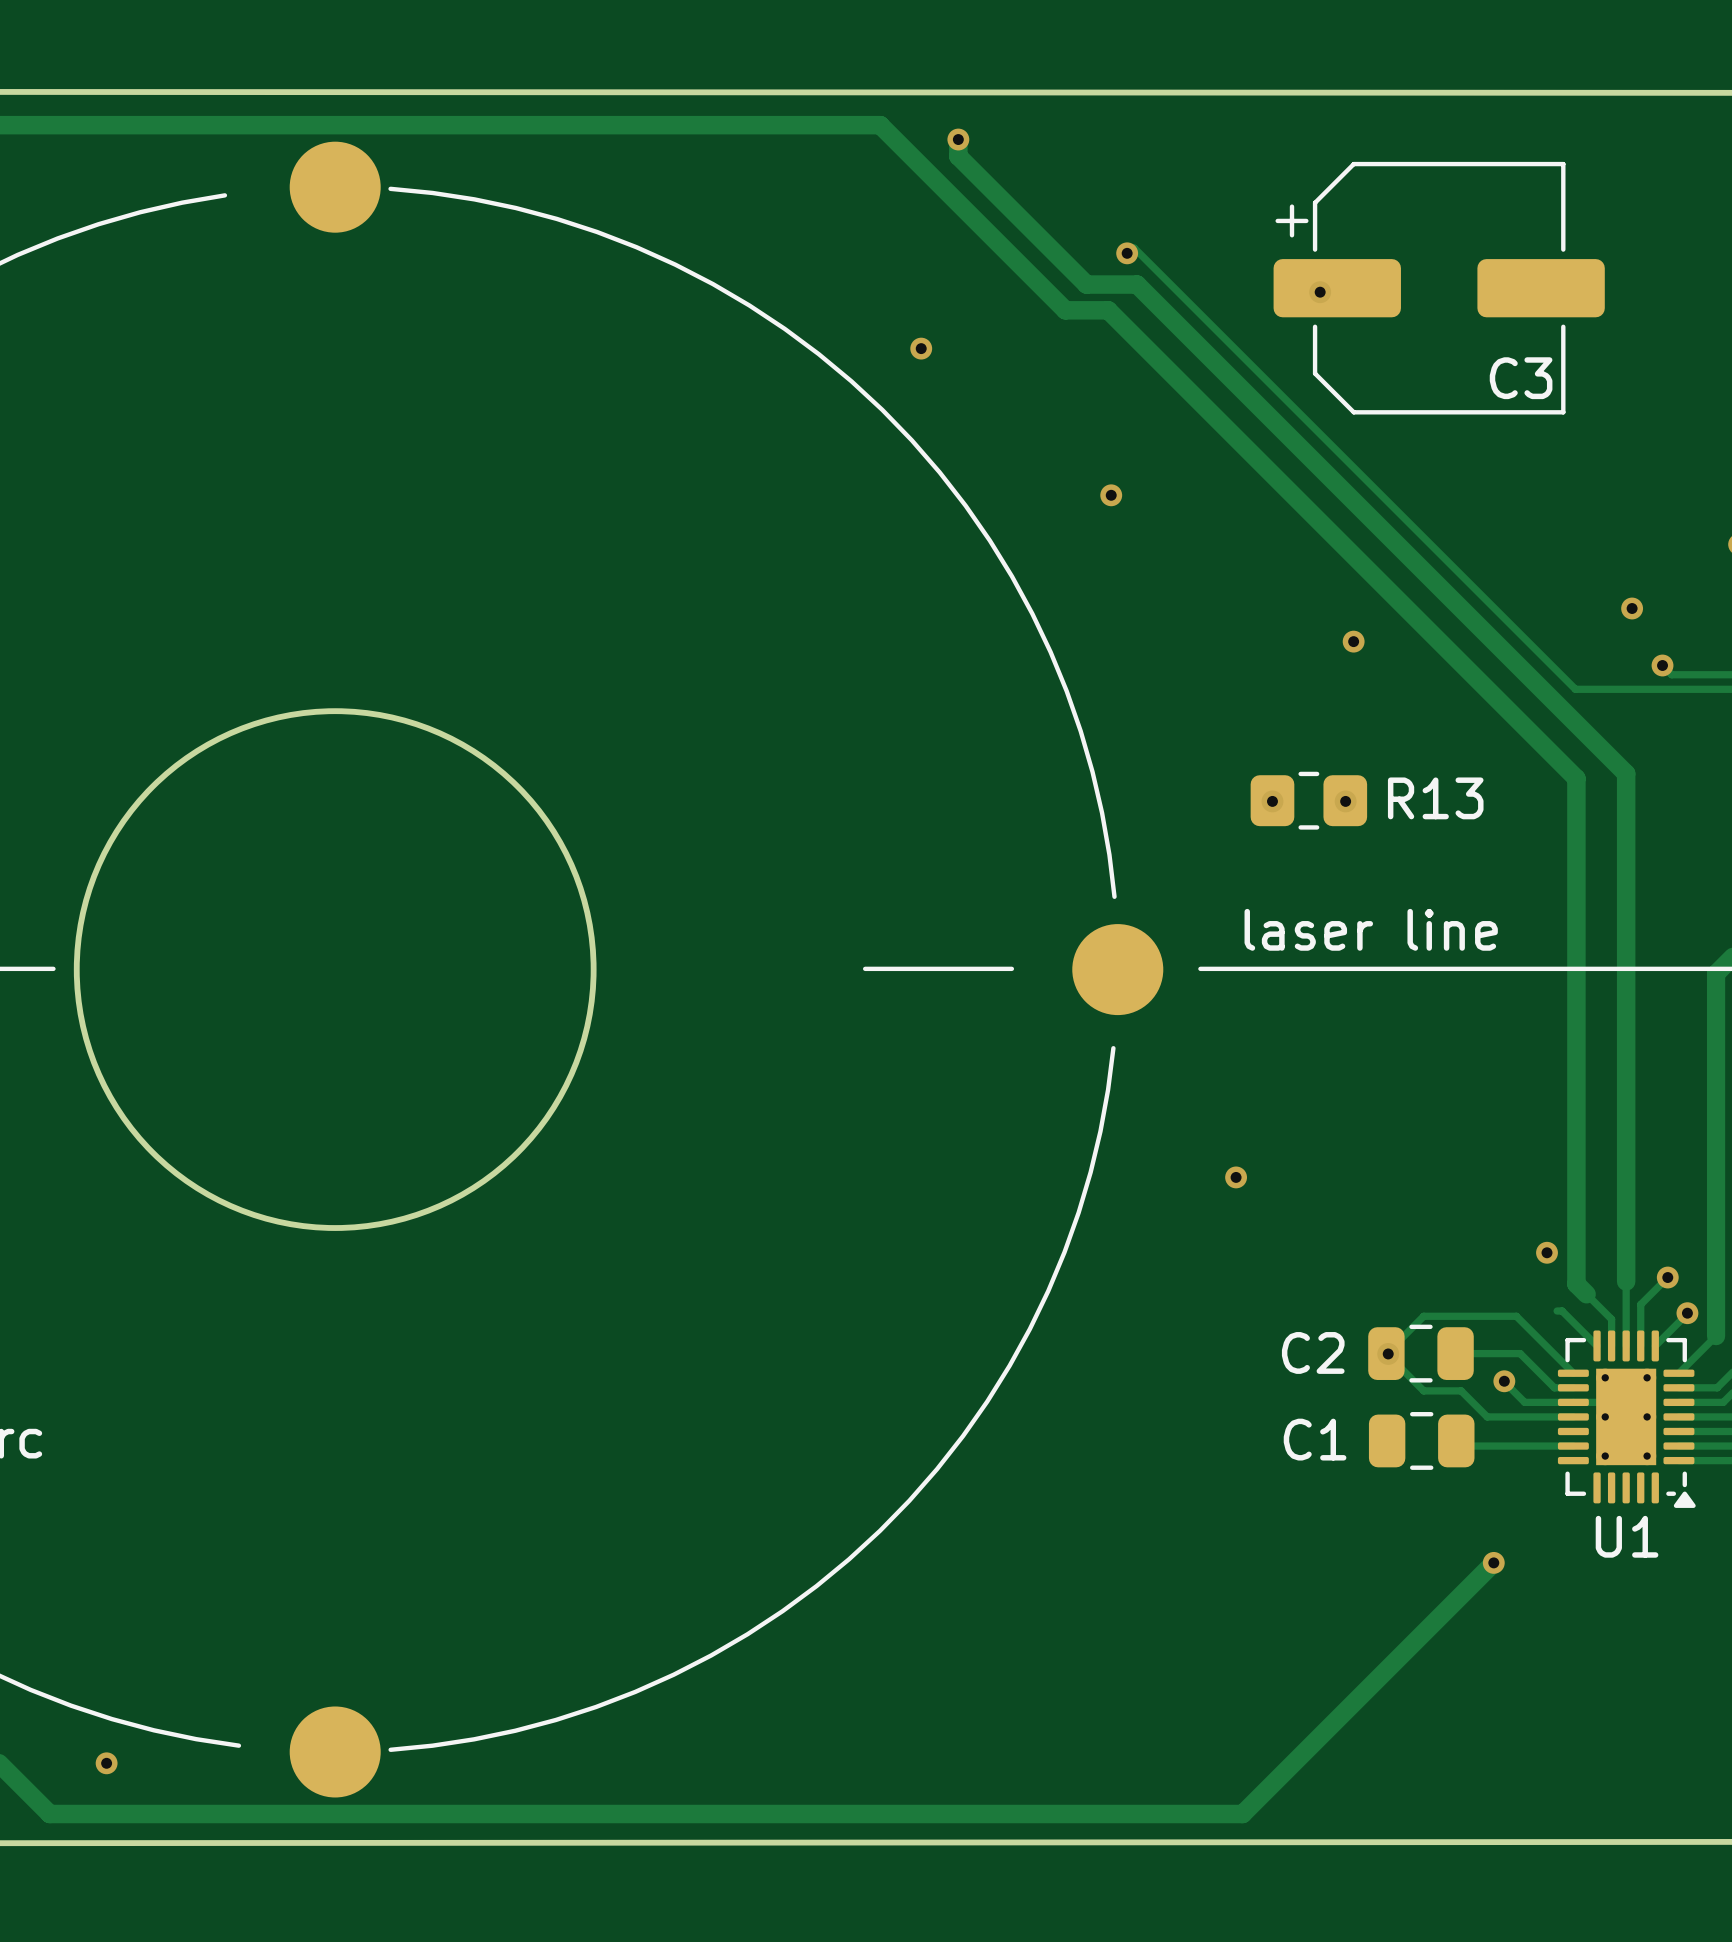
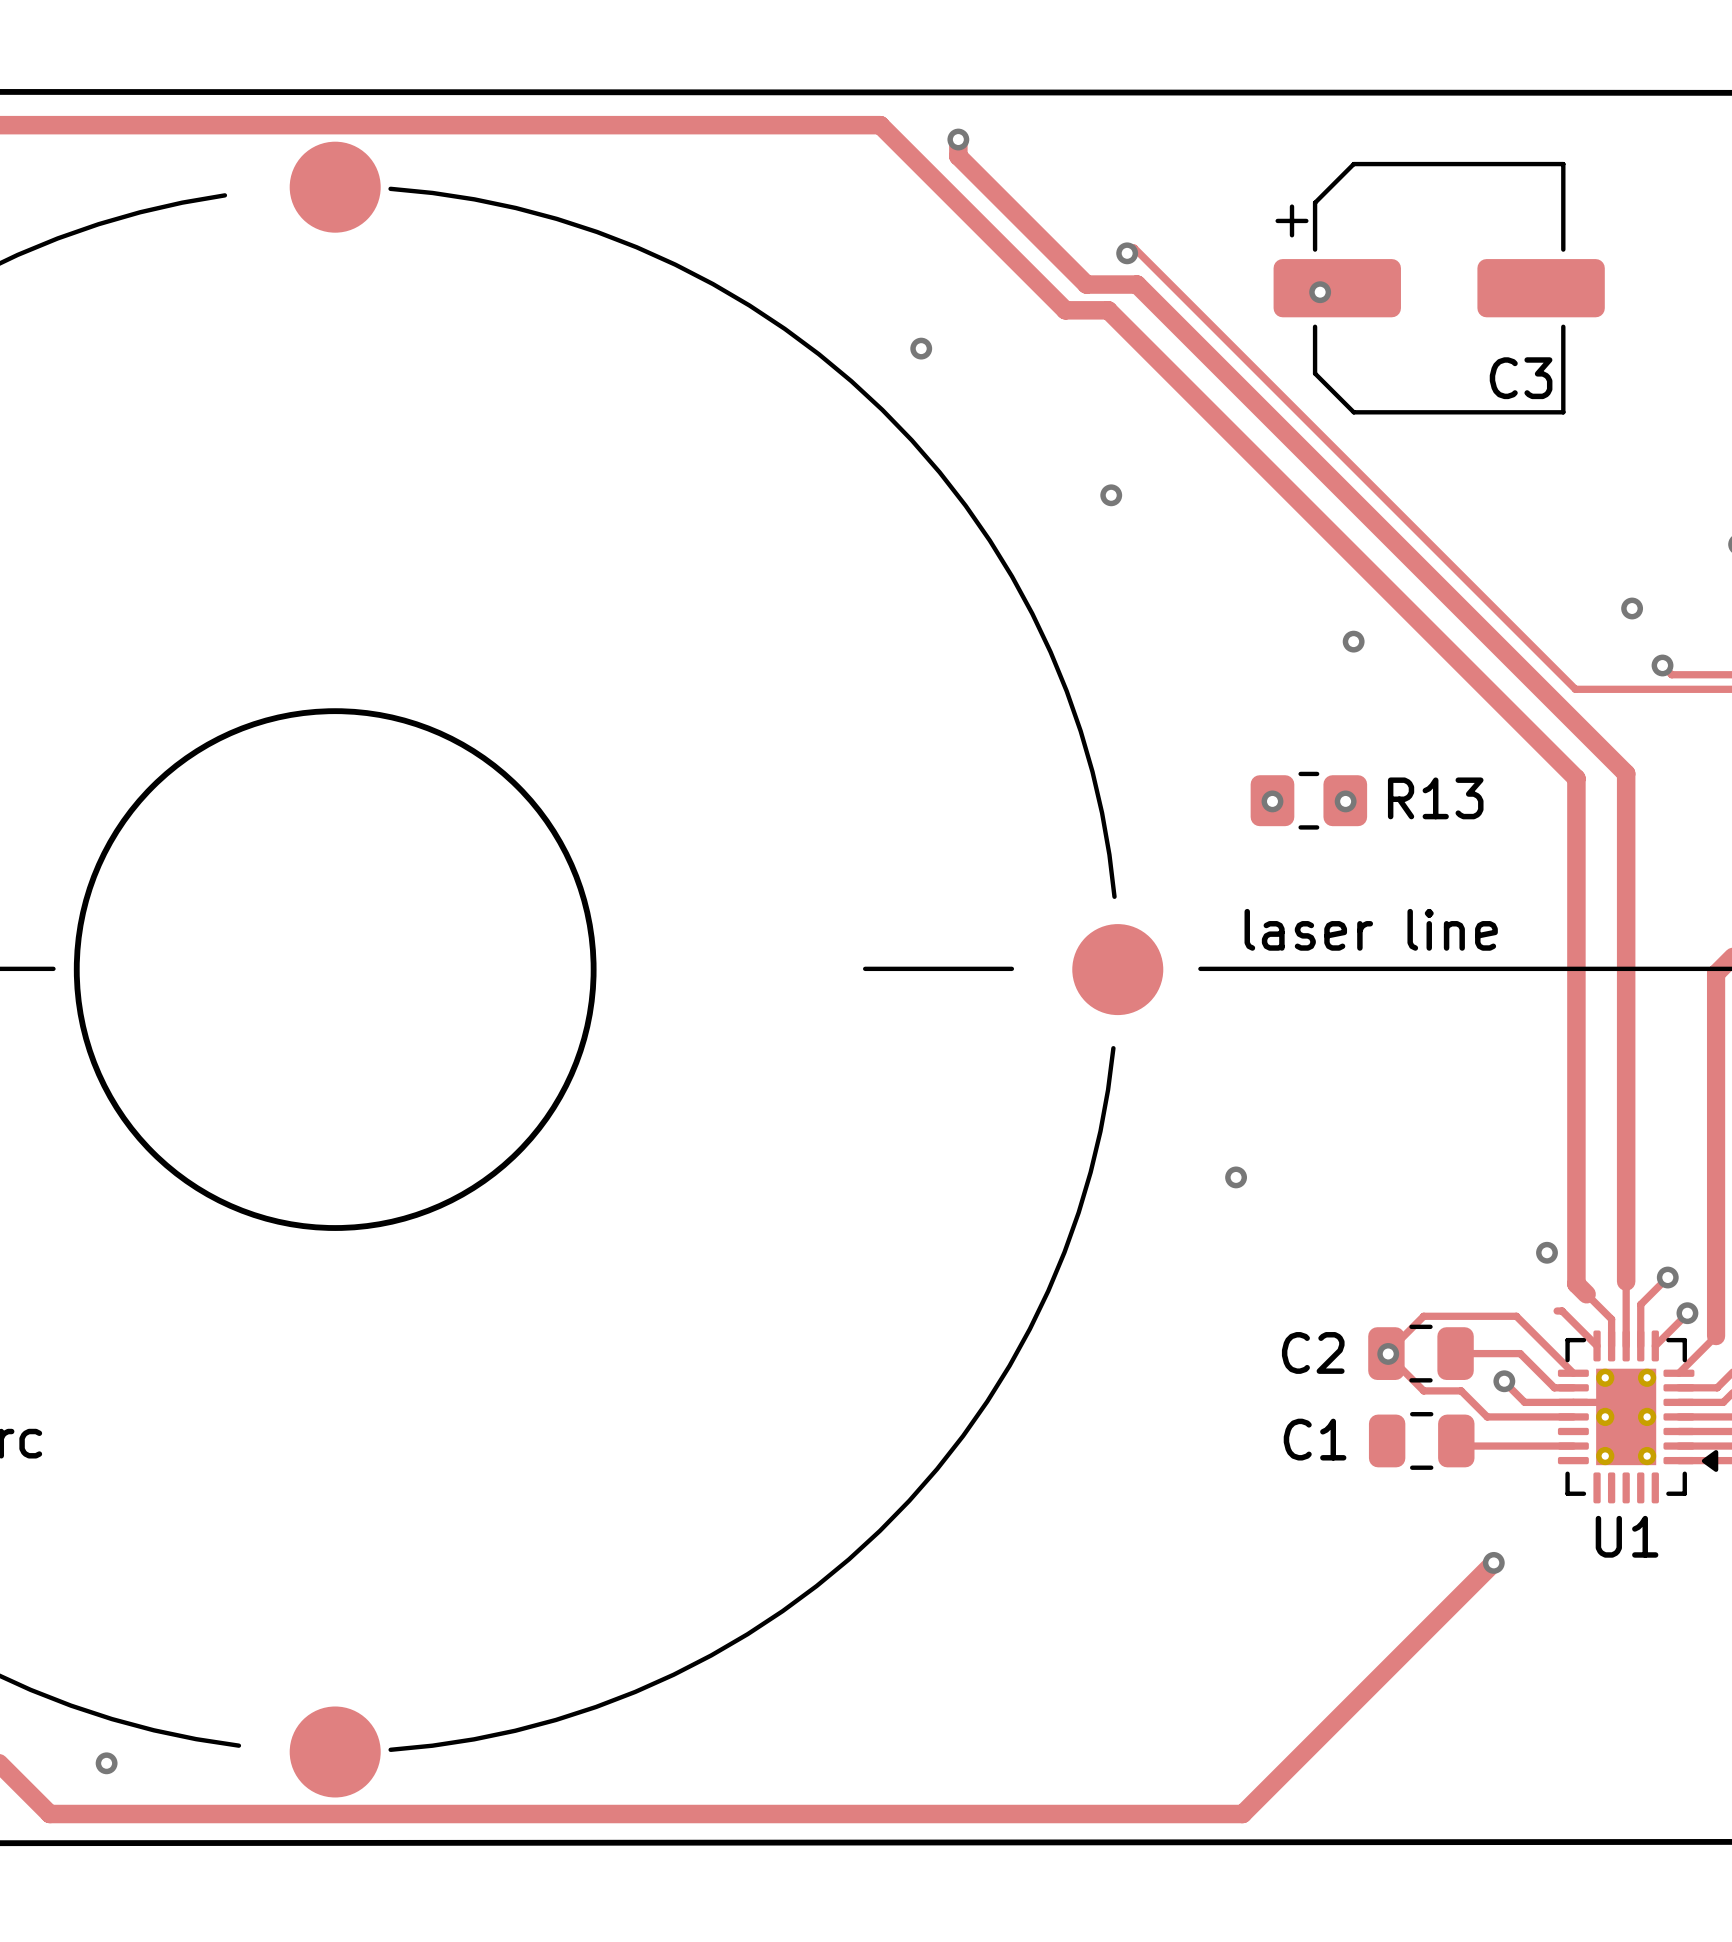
U1 footprint: [1557, 1330, 1696, 1508] -> [1557, 1330, 1719, 1504]

